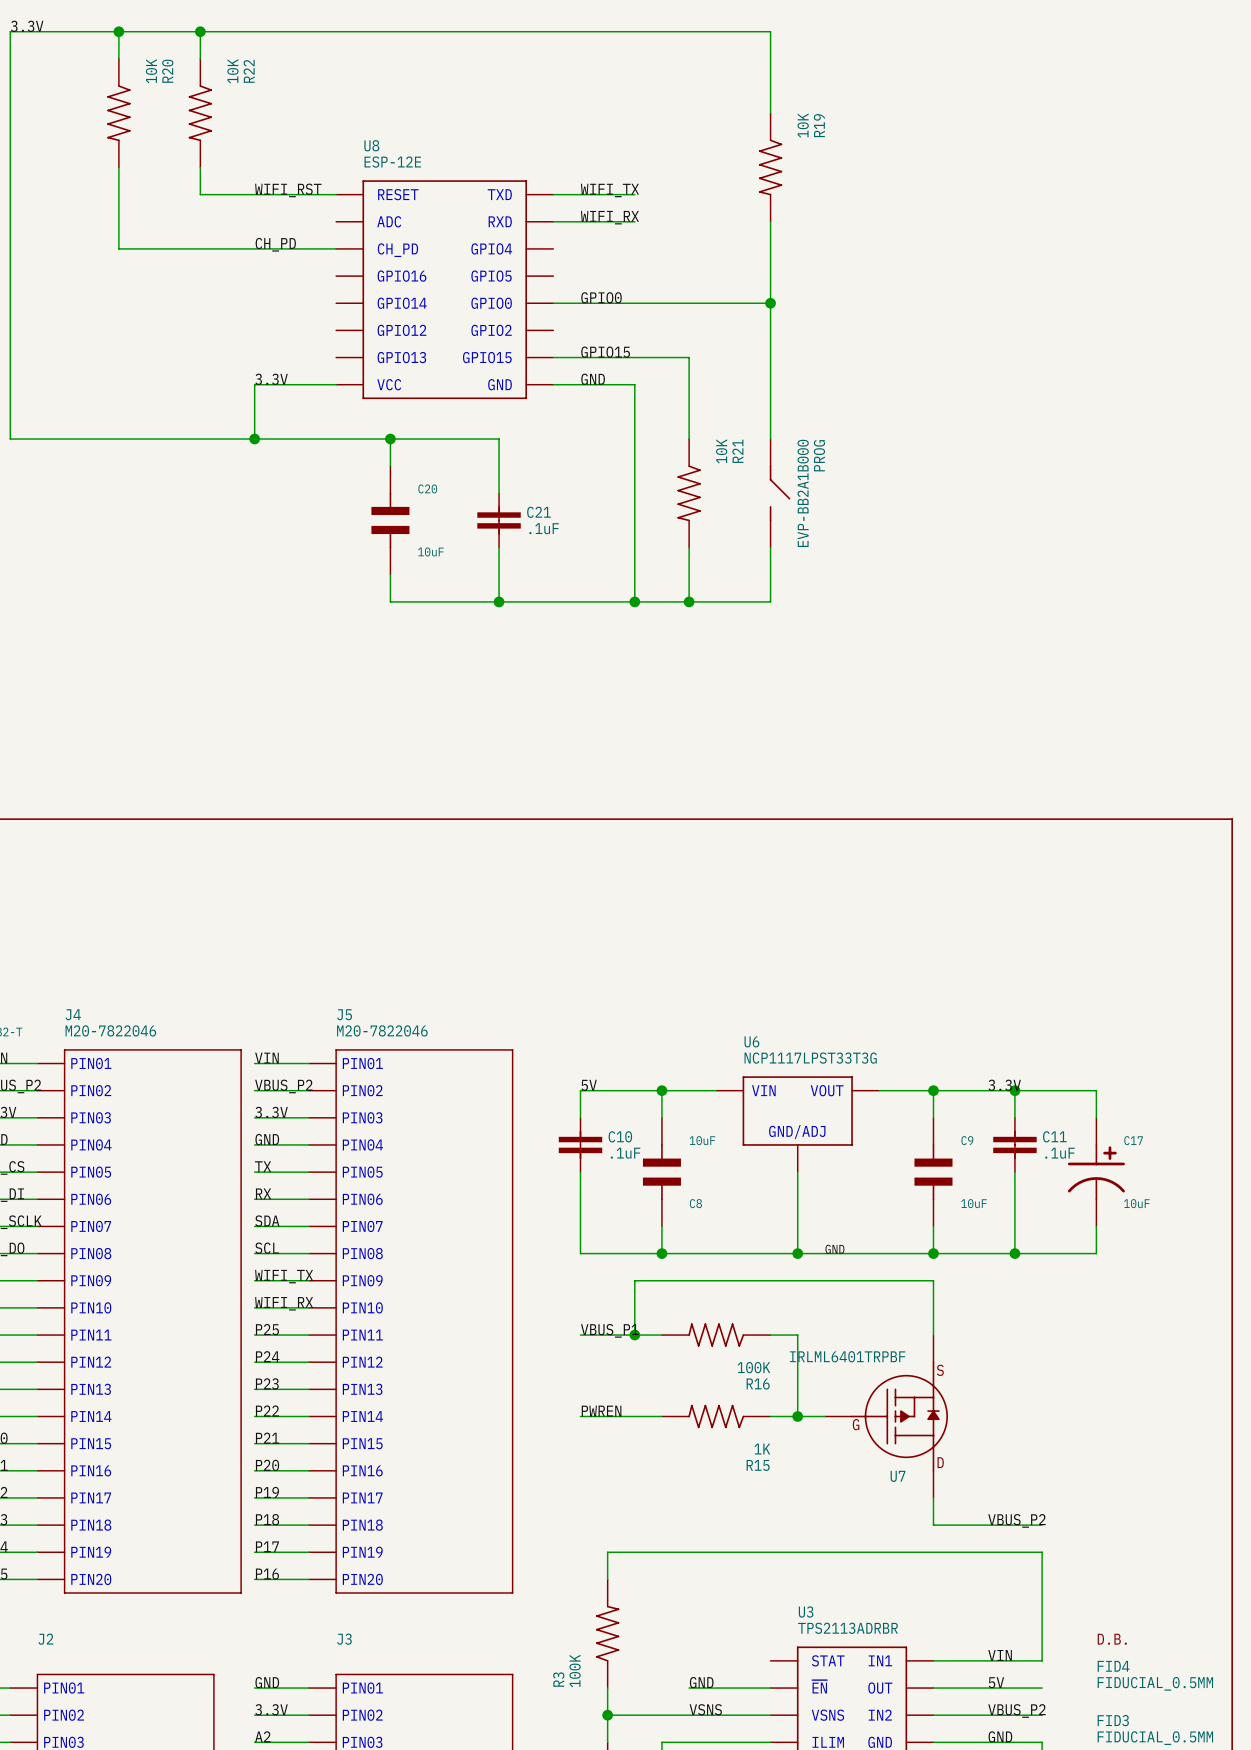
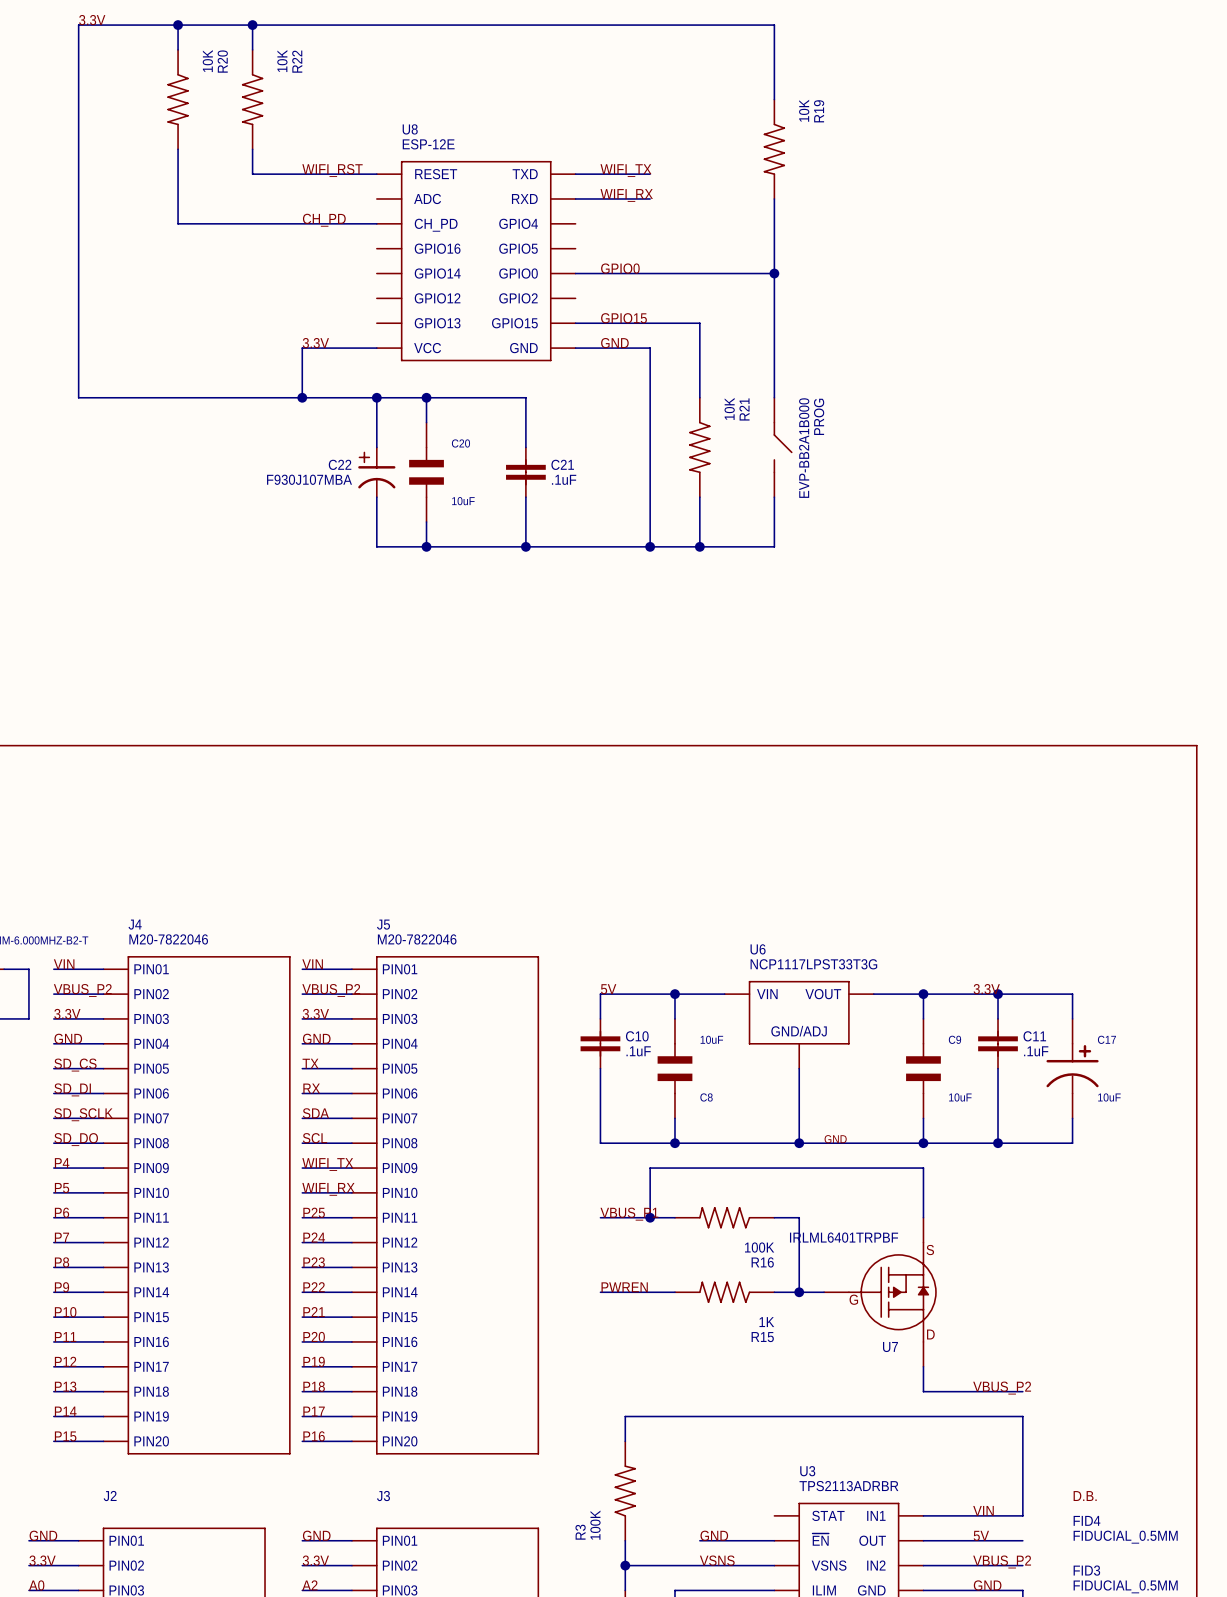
wire: none -> (376, 397) (376, 447)
junction: none -> (376, 397)
C22: none -> F930J107MBA (376, 472)
wire: none -> (376, 497) (376, 546) (426, 546)
junction: none -> (426, 546)

